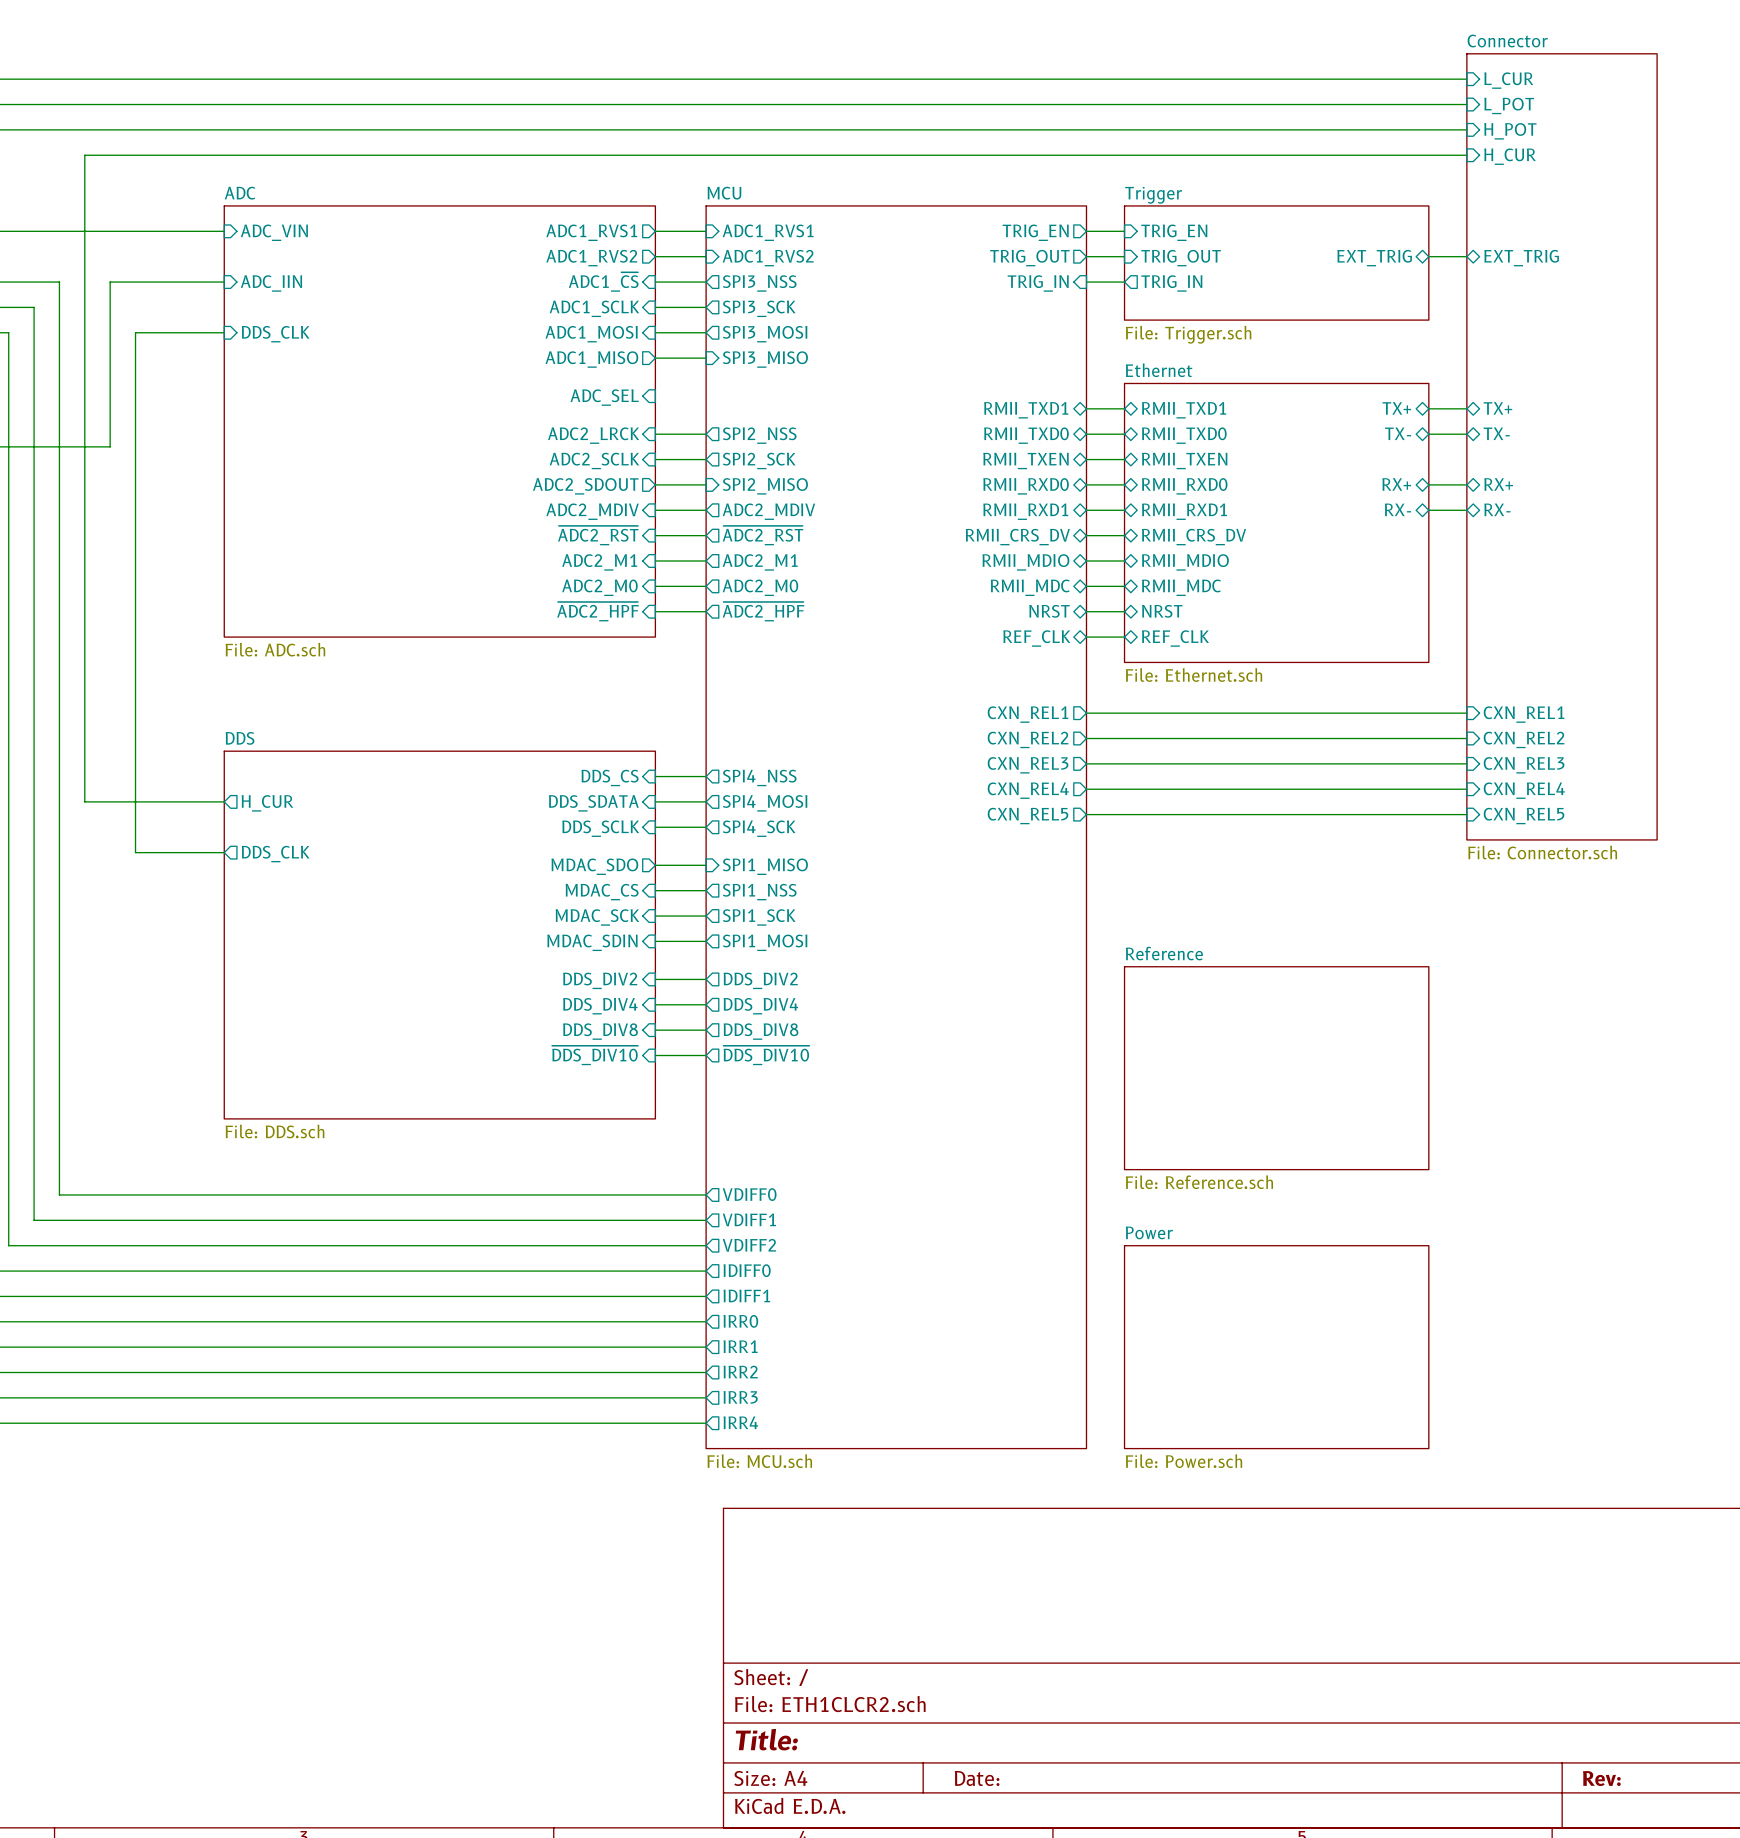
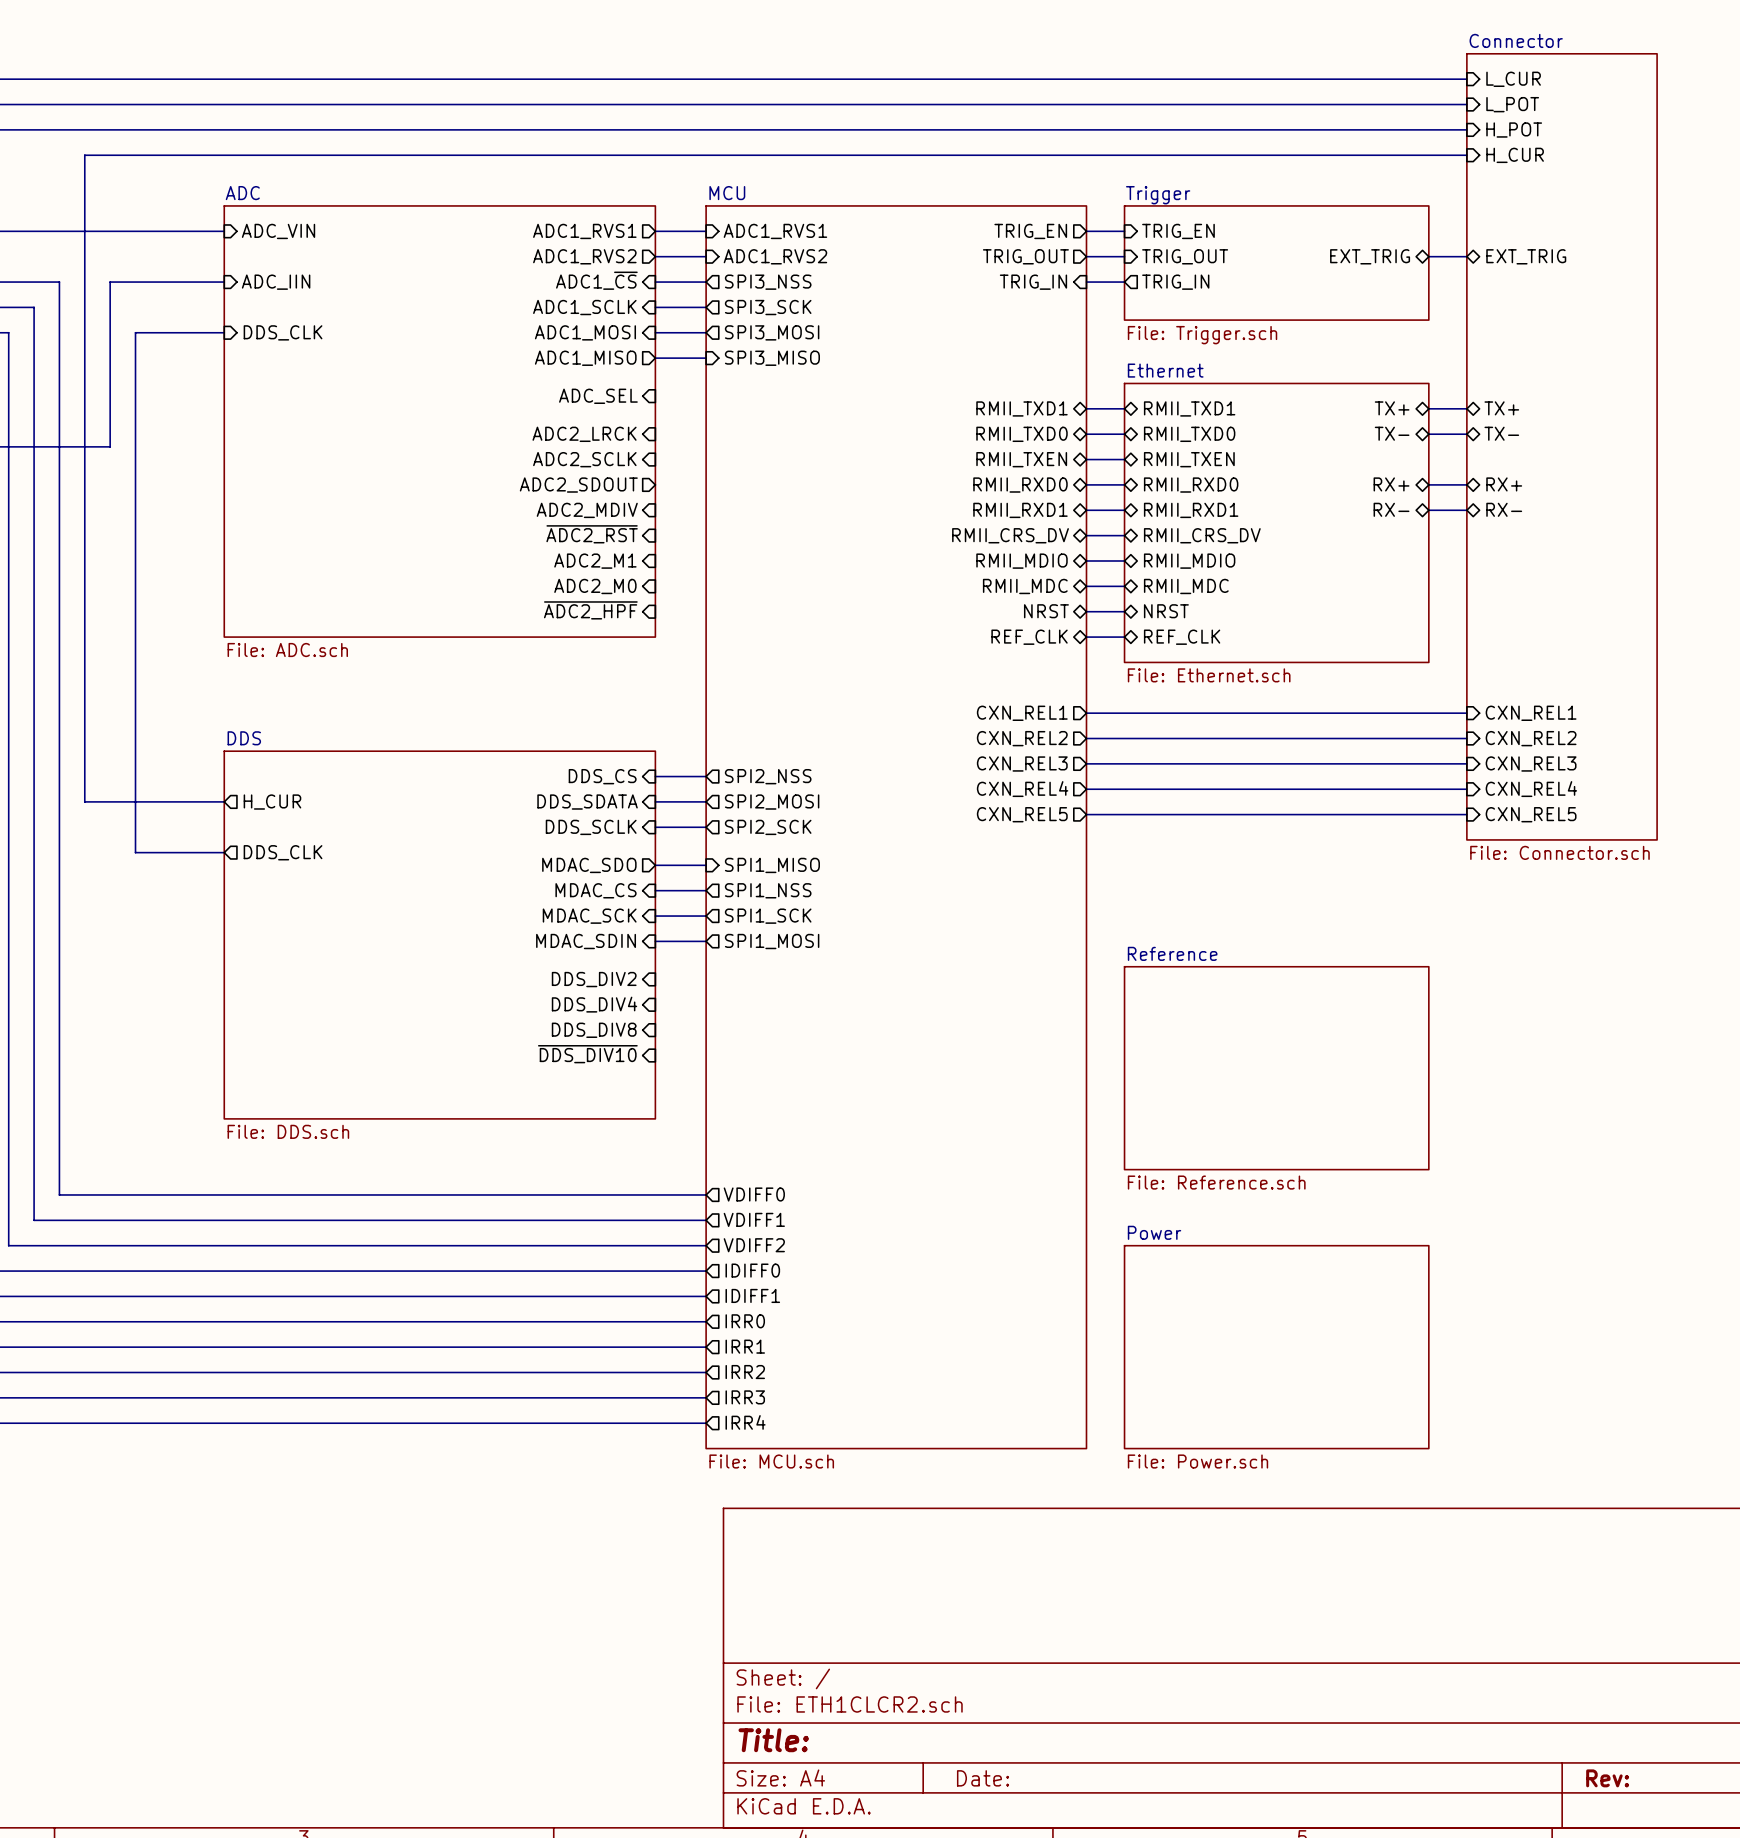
wire: (655, 434) (706, 434) -> none
sheet pin: SPI2_NSS (759, 435) -> none
wire: (655, 459) (706, 459) -> none
sheet pin: SPI2_SCK (759, 460) -> none
wire: (655, 484) (706, 484) -> none
sheet pin: SPI2_MISO (765, 486) -> none
wire: (655, 510) (706, 510) -> none
sheet pin: ADC2_MDIV (768, 511) -> none
wire: (655, 535) (706, 535) -> none
sheet pin: ~{ADC2_RST} (762, 535) -> none
wire: (655, 560) (706, 560) -> none
sheet pin: ADC2_M1 (760, 562) -> none
wire: (655, 586) (706, 586) -> none
sheet pin: ADC2_M0 (760, 587) -> none
wire: (655, 611) (706, 611) -> none
sheet pin: ~{ADC2_HPF} (763, 611) -> none
sheet pin: SPI4_NSS (759, 777) -> SPI2_NSS (768, 776)
sheet pin: SPI4_MOSI (765, 803) -> SPI2_MOSI (772, 802)
sheet pin: SPI4_SCK (759, 828) -> SPI2_SCK (768, 827)
wire: (655, 979) (706, 979) -> none
sheet pin: DDS_DIV2 (760, 980) -> none
wire: (655, 1004) (706, 1004) -> none
sheet pin: DDS_DIV4 (760, 1006) -> none
wire: (655, 1030) (706, 1030) -> none
sheet pin: DDS_DIV8 (761, 1031) -> none
wire: (655, 1055) (706, 1055) -> none
sheet pin: ~{DDS_DIV10} (766, 1055) -> none

